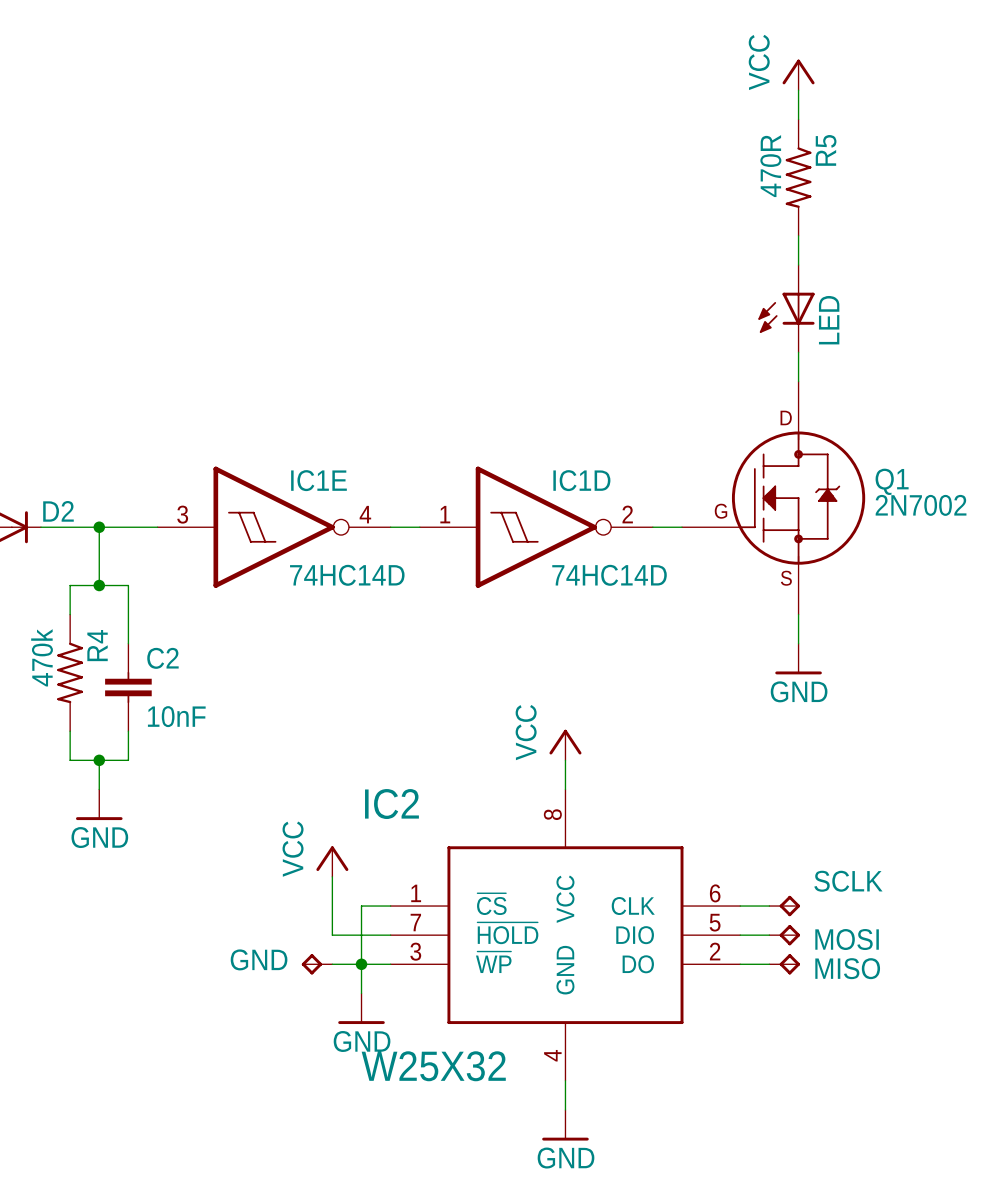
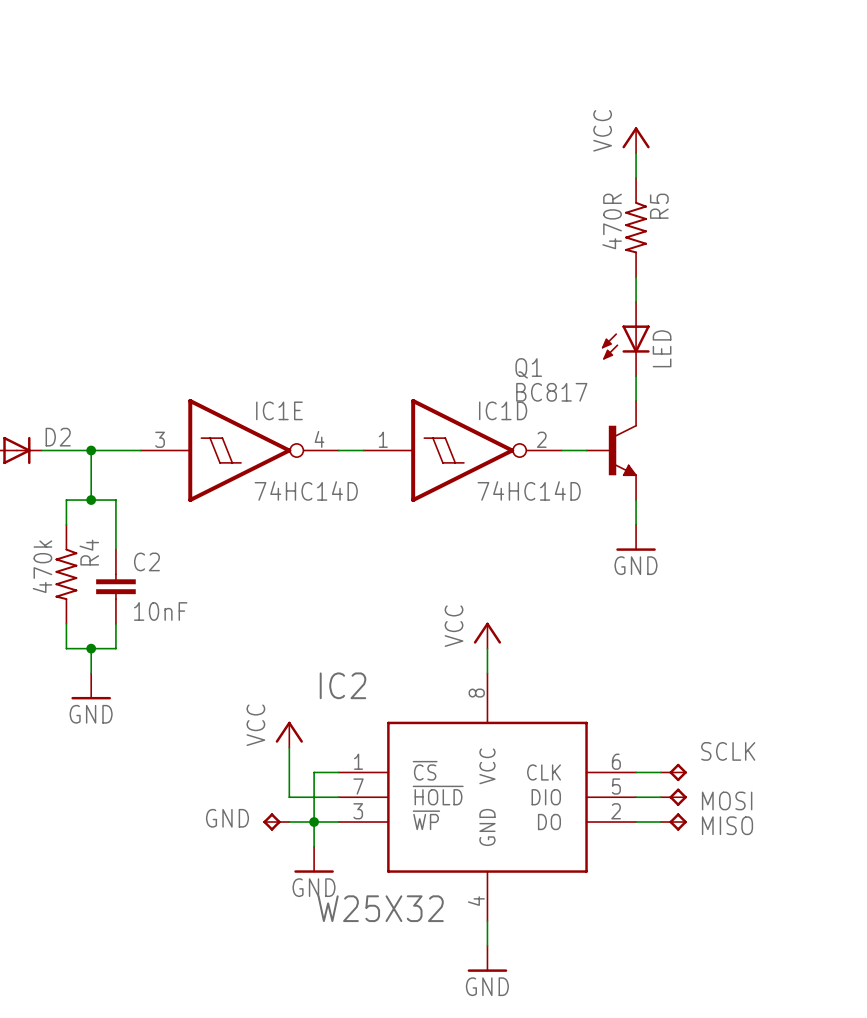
power symbol position: VCC (798, 74) -> VCC (636, 140)
wire: (798, 90) (798, 119) -> none
R5 position: (798, 177) -> (636, 227)
wire: (798, 235) (798, 265) -> (636, 153) (636, 178)
LED position: (786, 308) -> (625, 339)
wire: (798, 352) (798, 381) -> (636, 277) (636, 301)
Q1 symbol: [682, 381, 866, 615] -> [586, 400, 637, 501]
wire: none -> (636, 376) (636, 400)
Q1 name position: Q1 (892, 481) -> Q1 (528, 368)
Q1 value: 2N7002 (921, 505) -> BC817 (551, 392)
wire: (798, 614) (798, 643) -> (636, 500) (636, 524)
power symbol position: GND (798, 659) -> GND (636, 537)

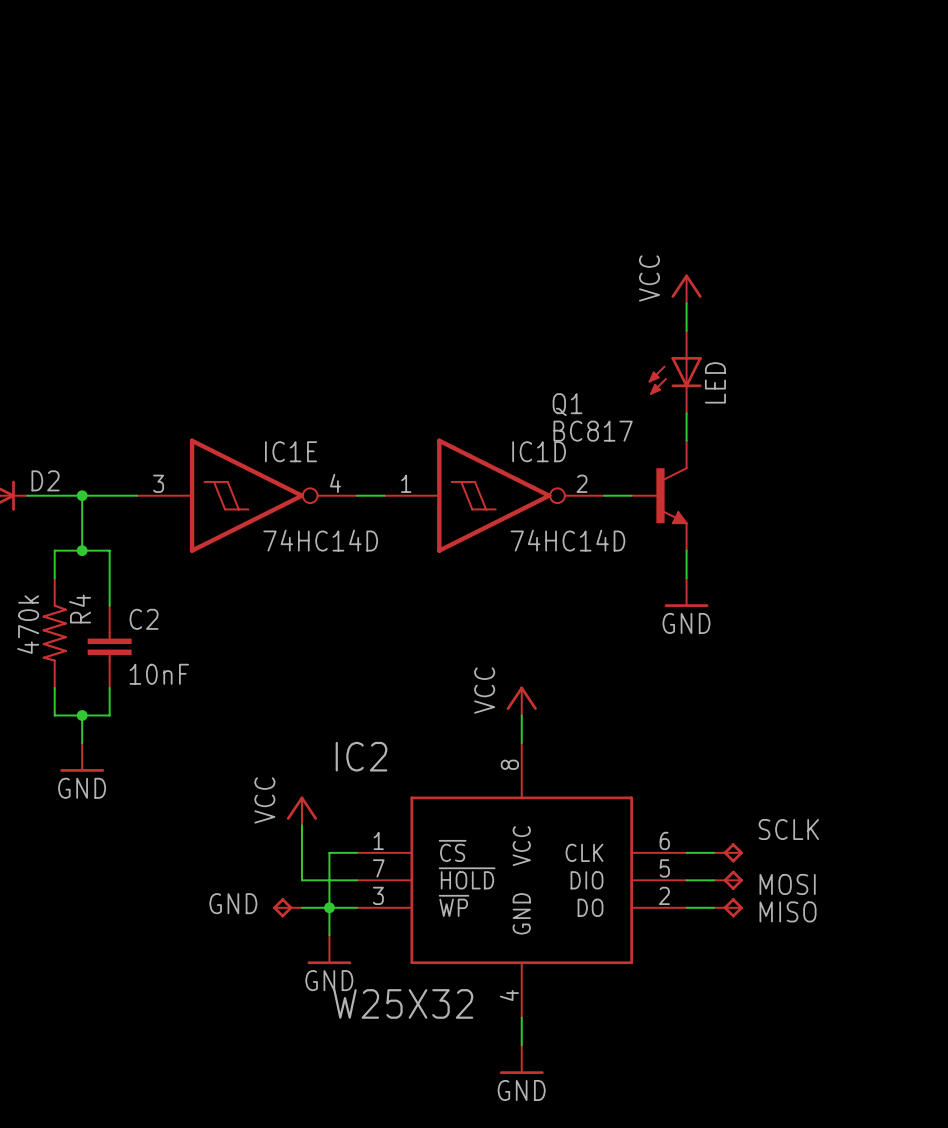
power symbol position: VCC (636, 140) -> VCC (686, 288)
wire: (636, 153) (636, 178) -> none
R5: 470R (636, 227) -> none

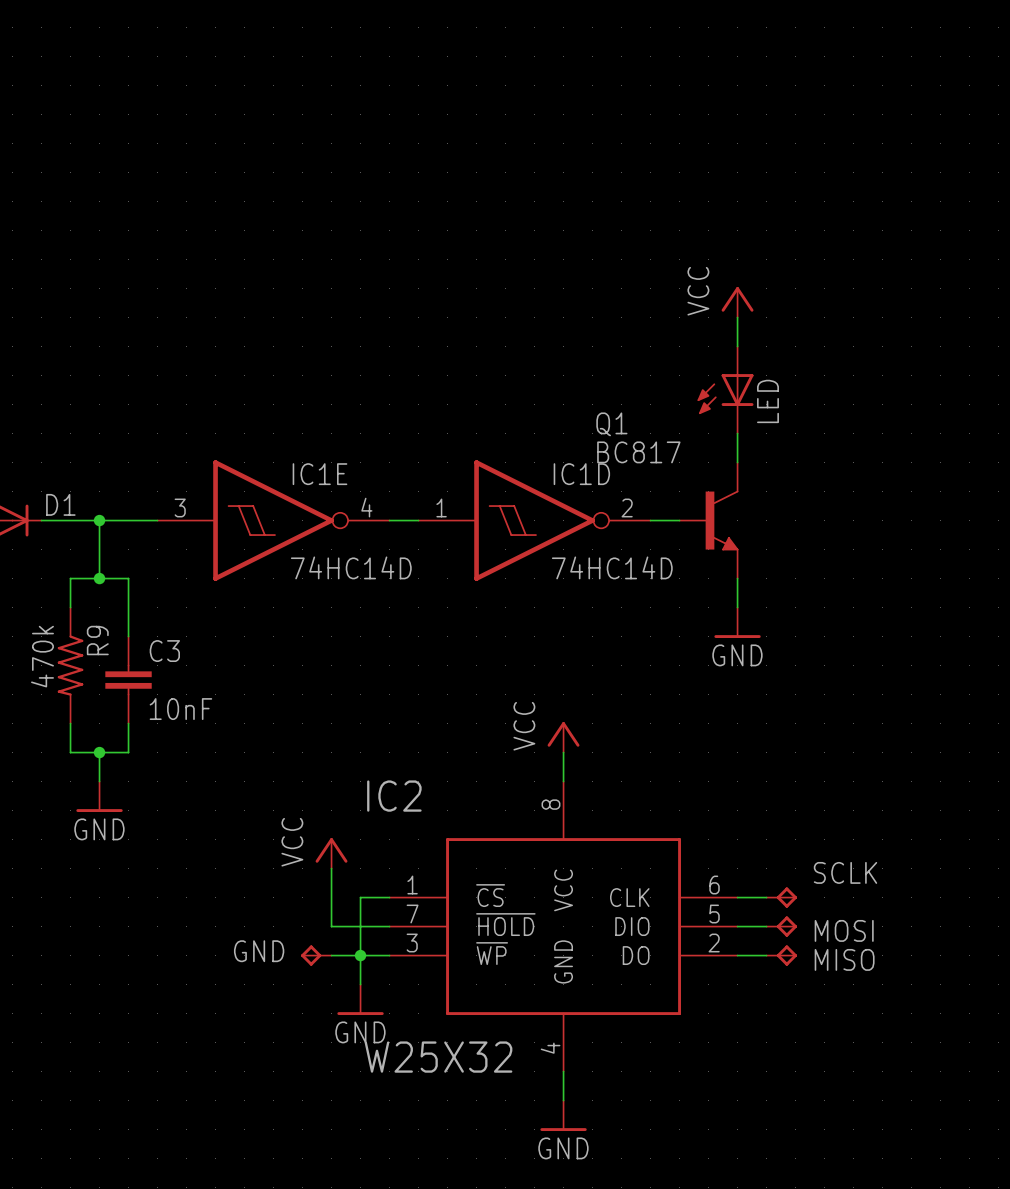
D2 name: D2 (45, 480) -> D1 (60, 504)
R4 name: R4 (80, 608) -> R9 (97, 640)
C2 name: C2 (144, 619) -> C3 (164, 651)

